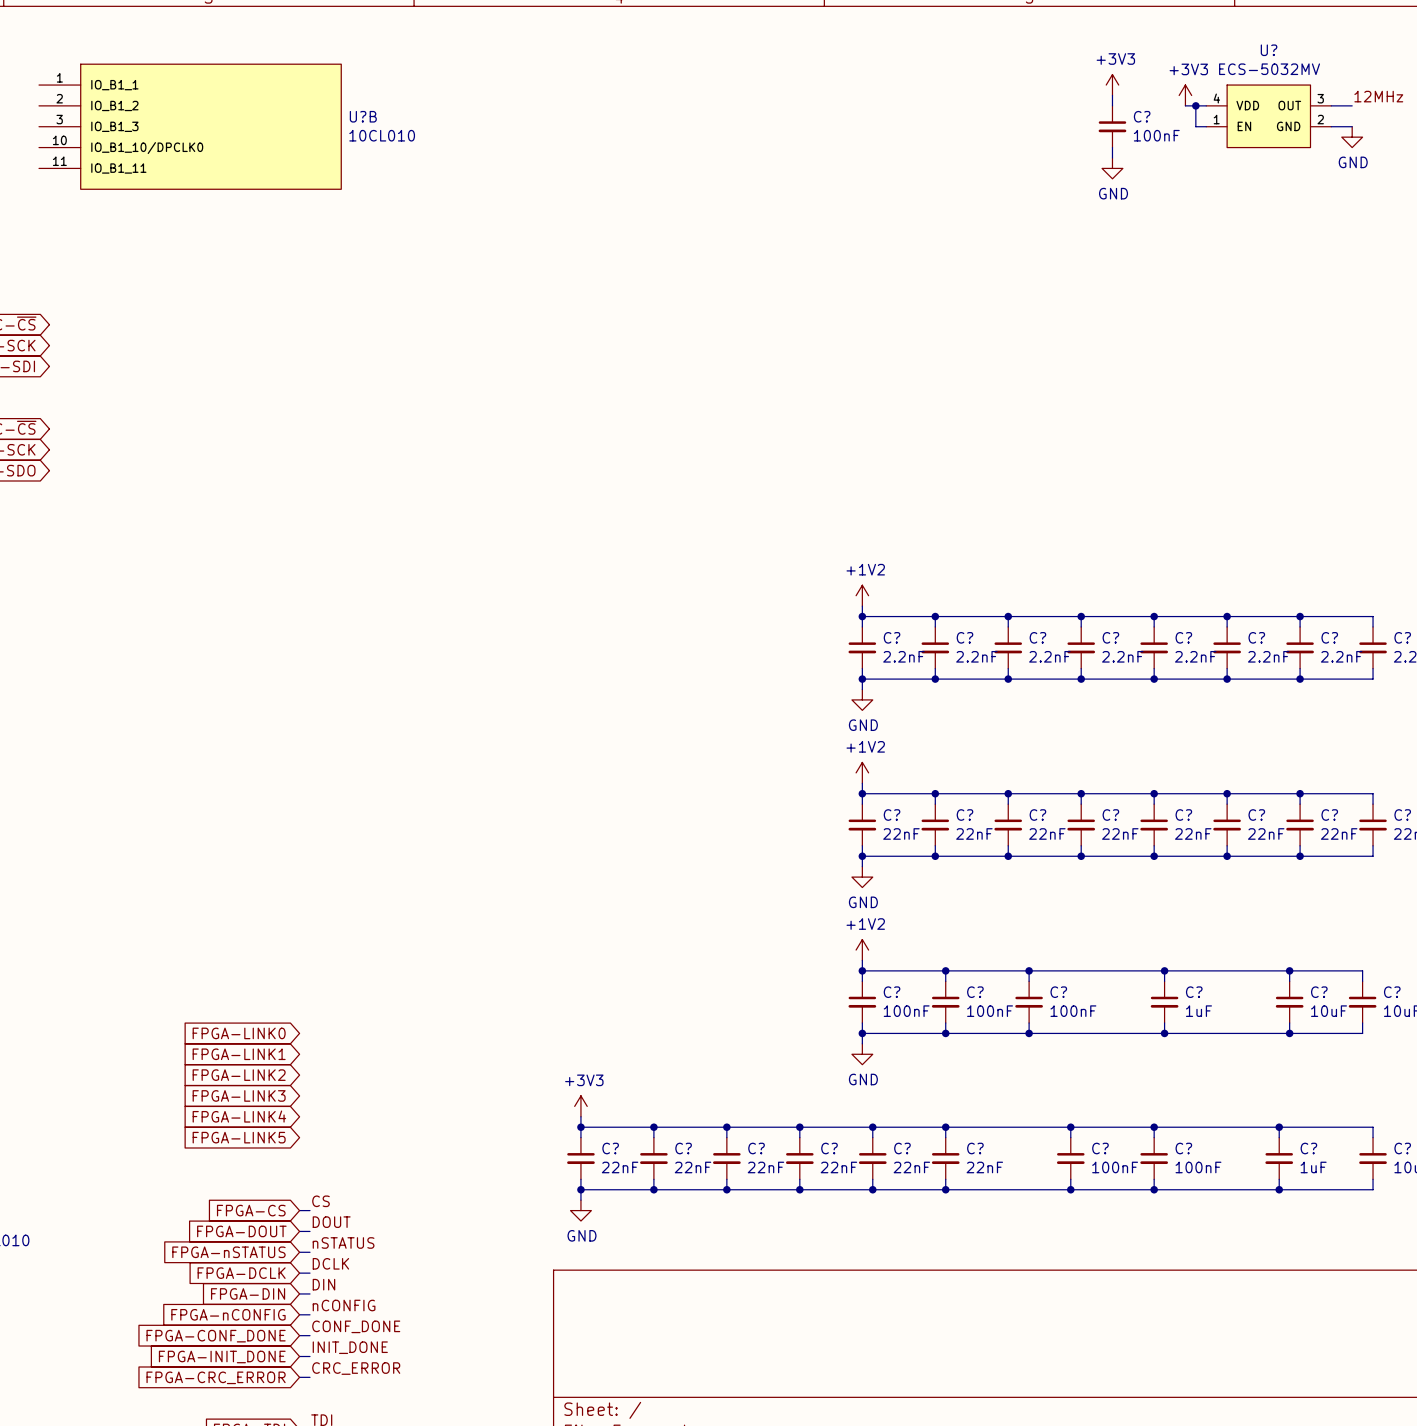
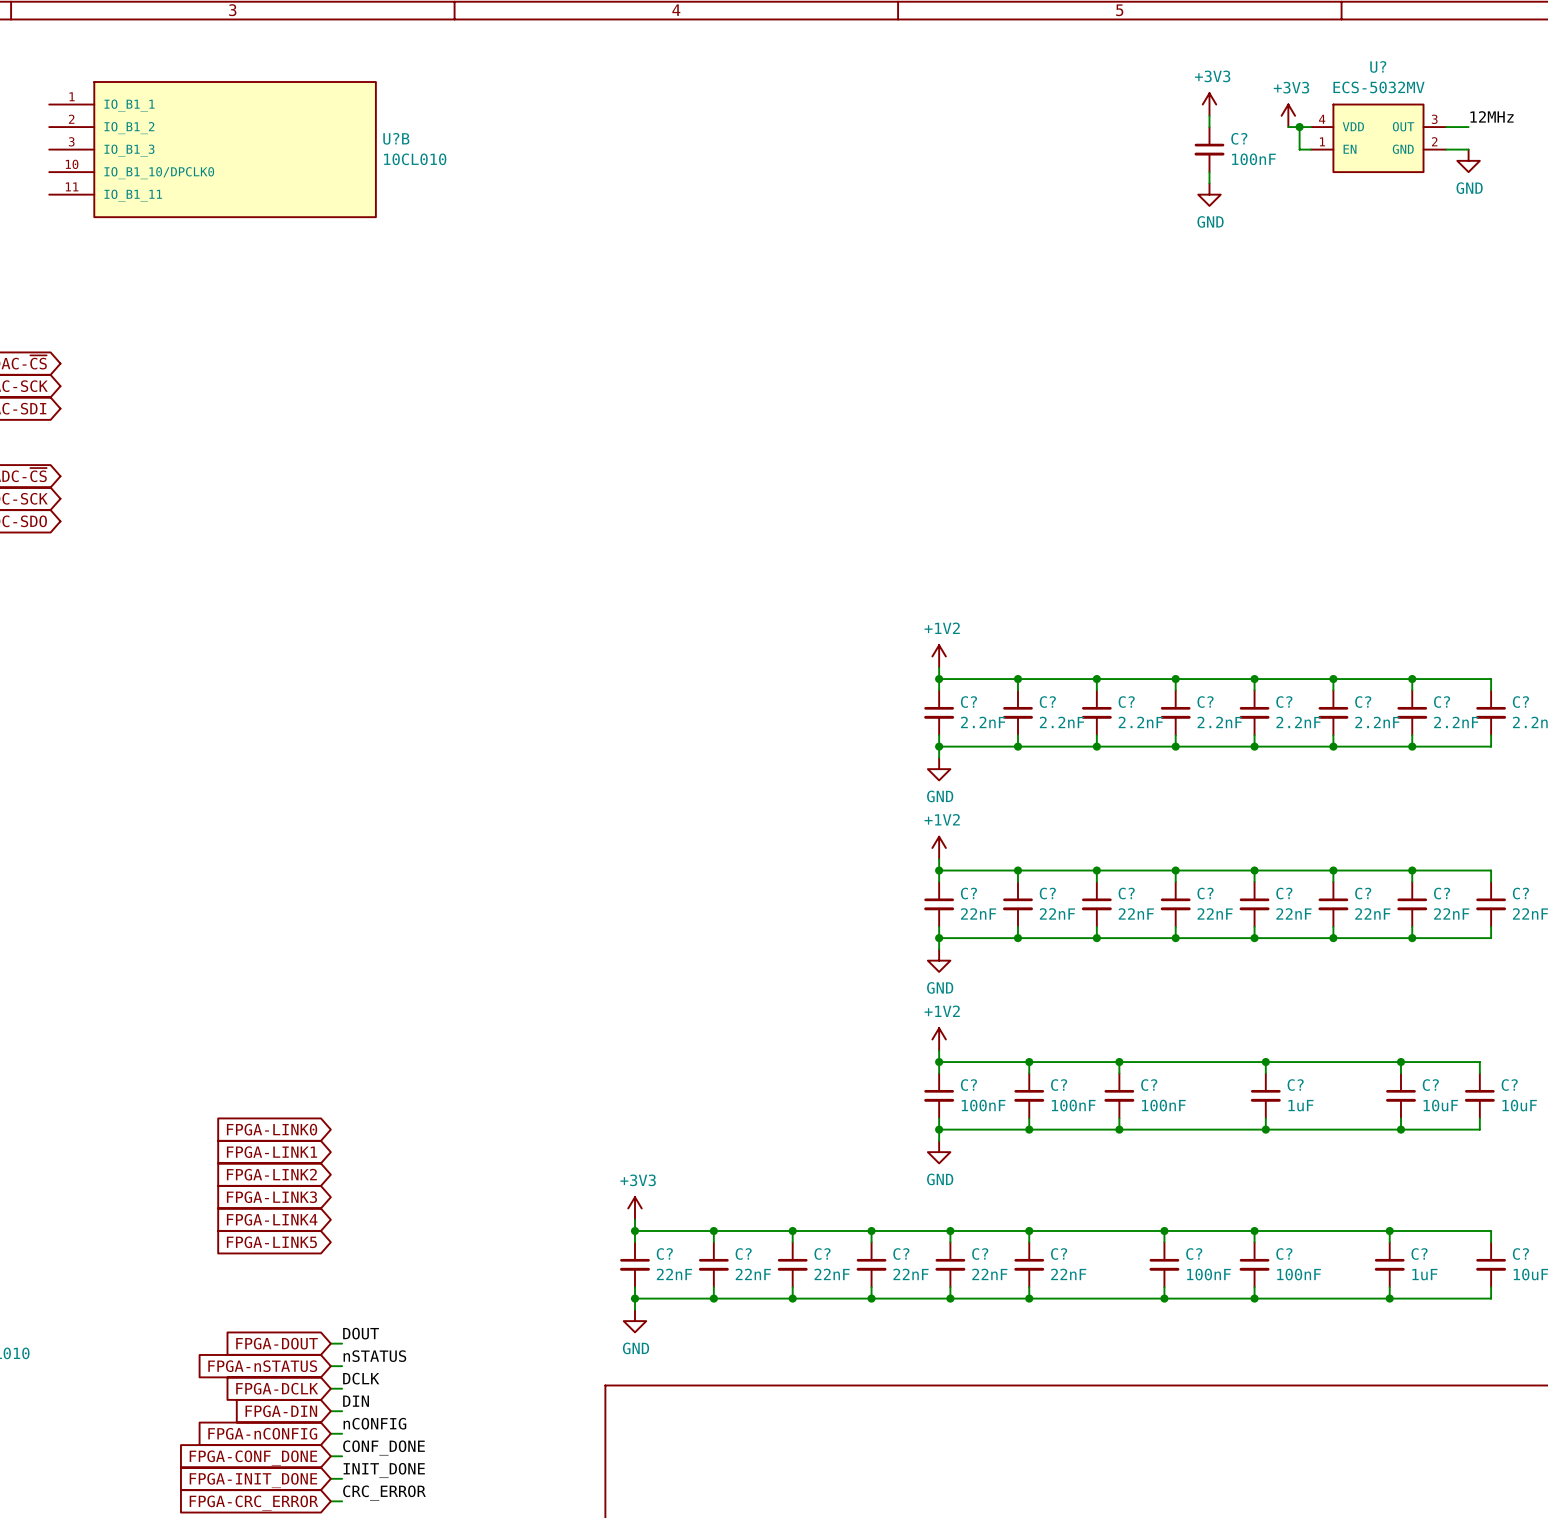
label: CS (320, 1201) -> none
global label: FPGA-CS (251, 1210) -> none
wire: (299, 1210) (309, 1210) -> none

